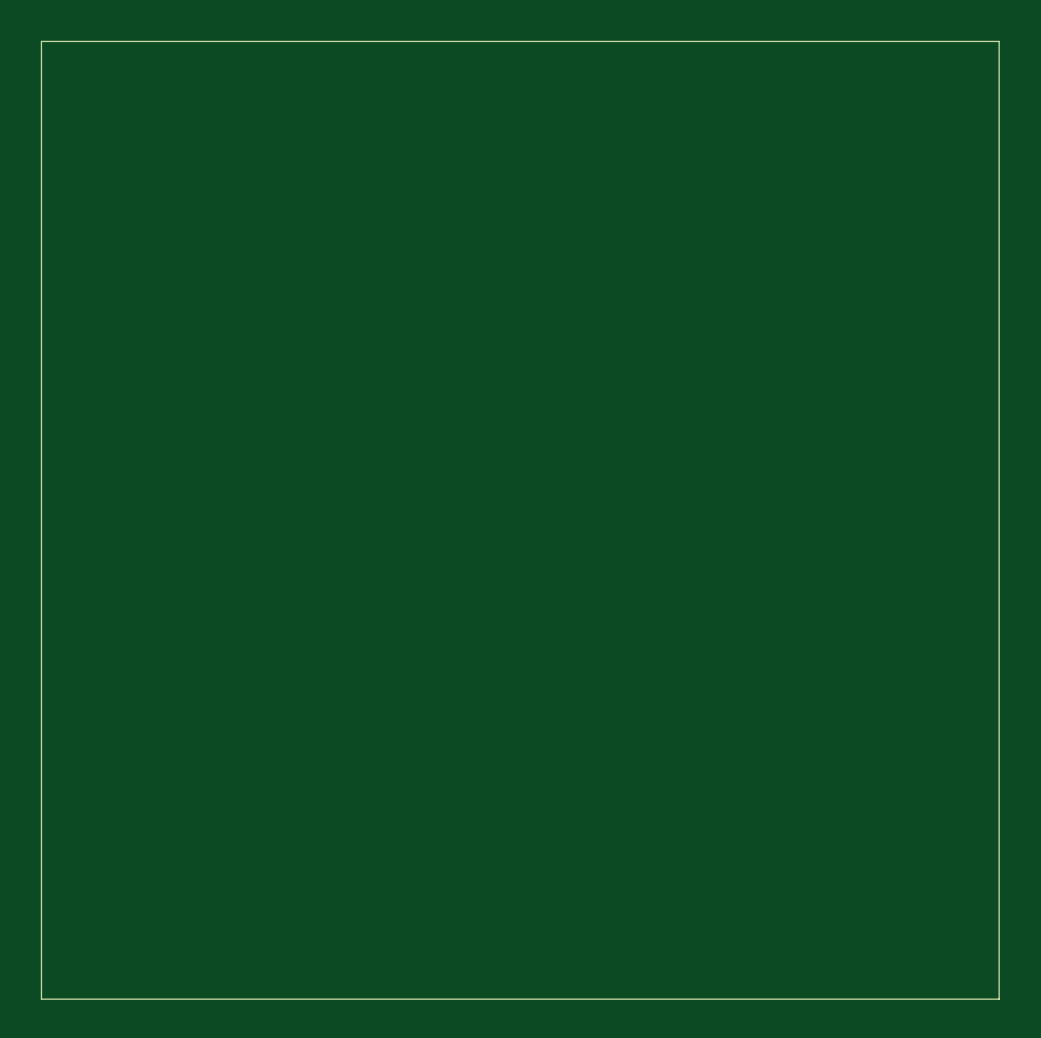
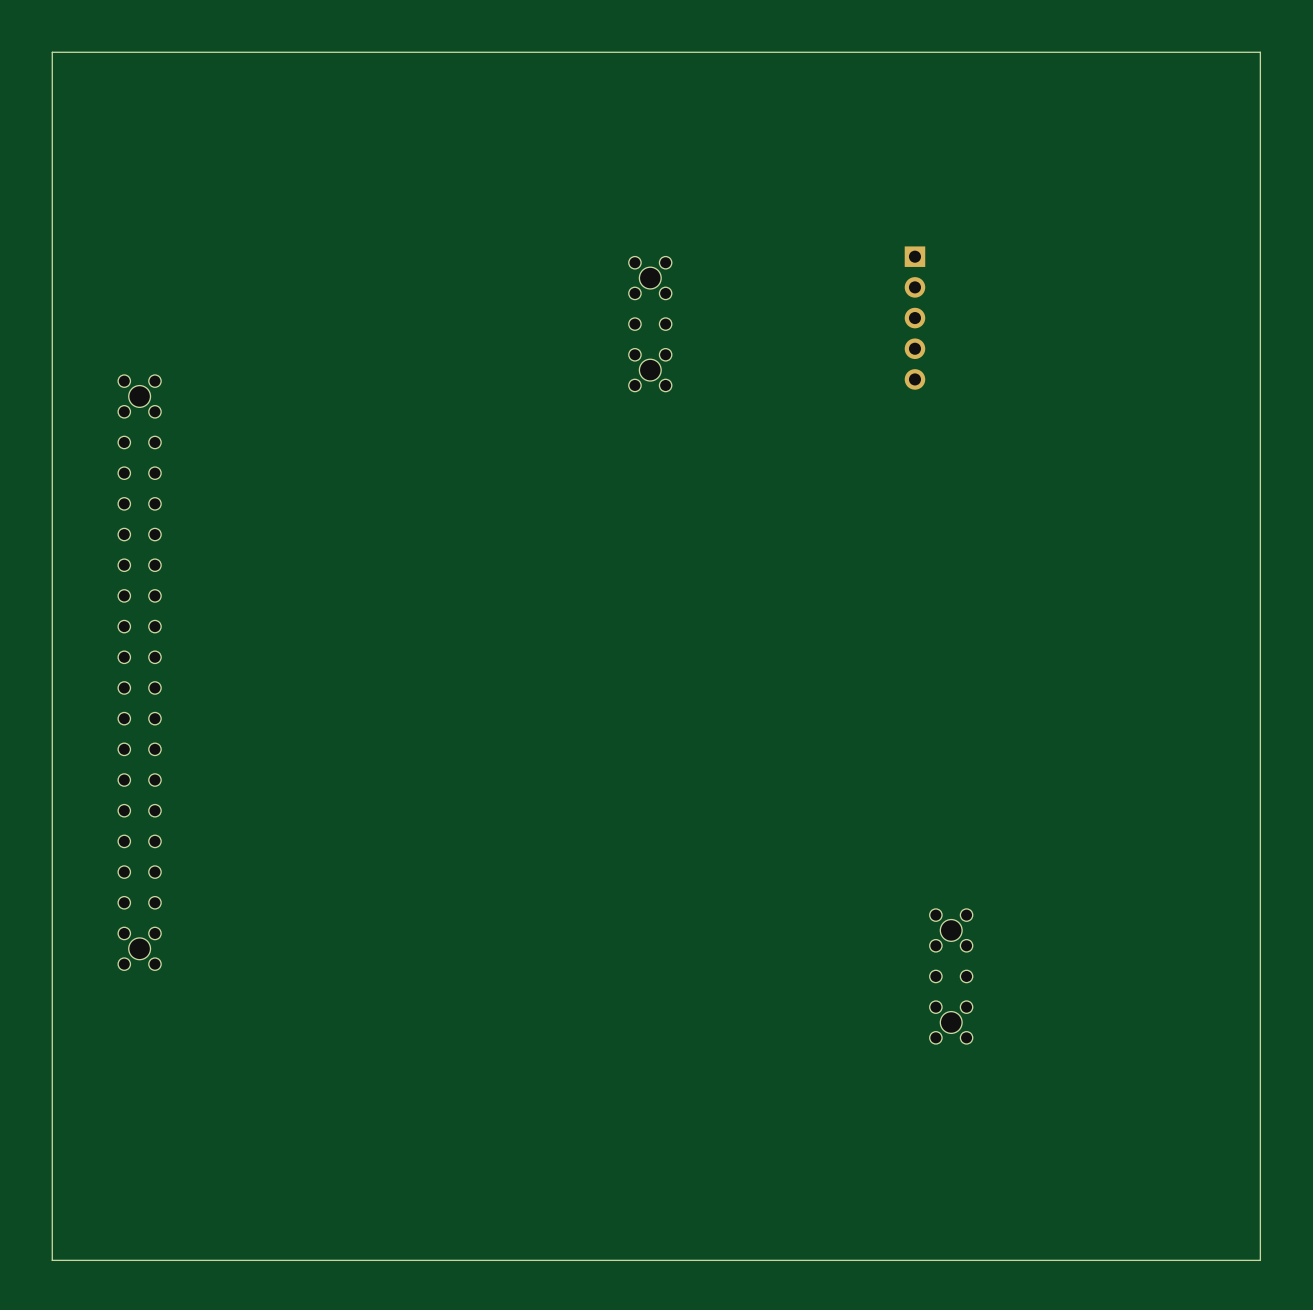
part: none -> (914, 318)
part: none -> (650, 324)
part: none -> (139, 672)
part: none -> (951, 976)

